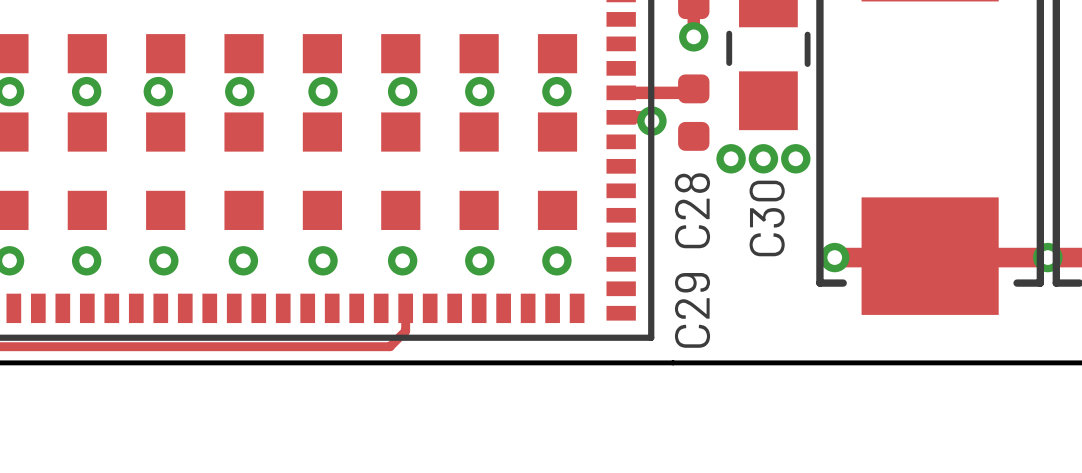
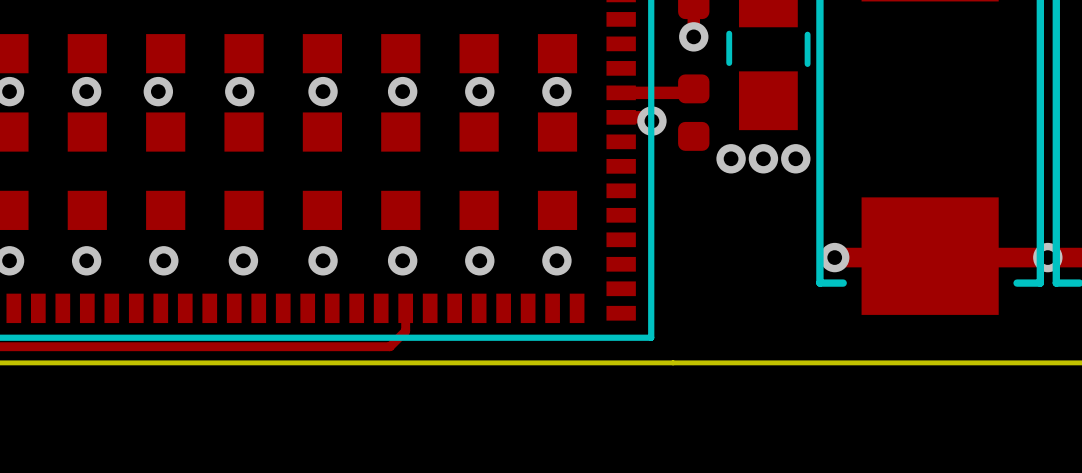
C28 name: C28 (692, 210) -> none
C30 name: C30 (767, 218) -> none
C29 name: C29 (692, 310) -> none

